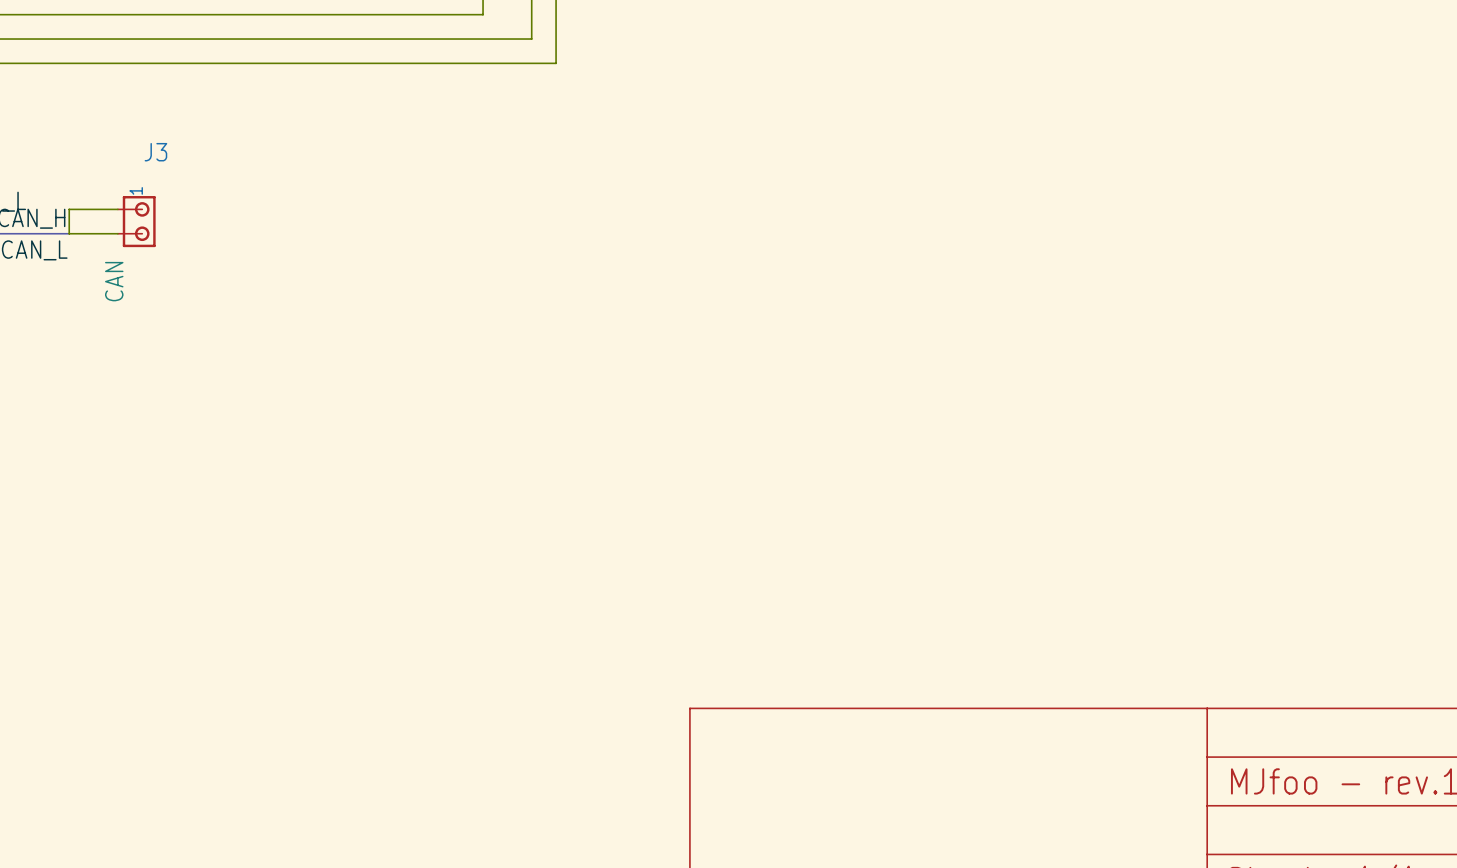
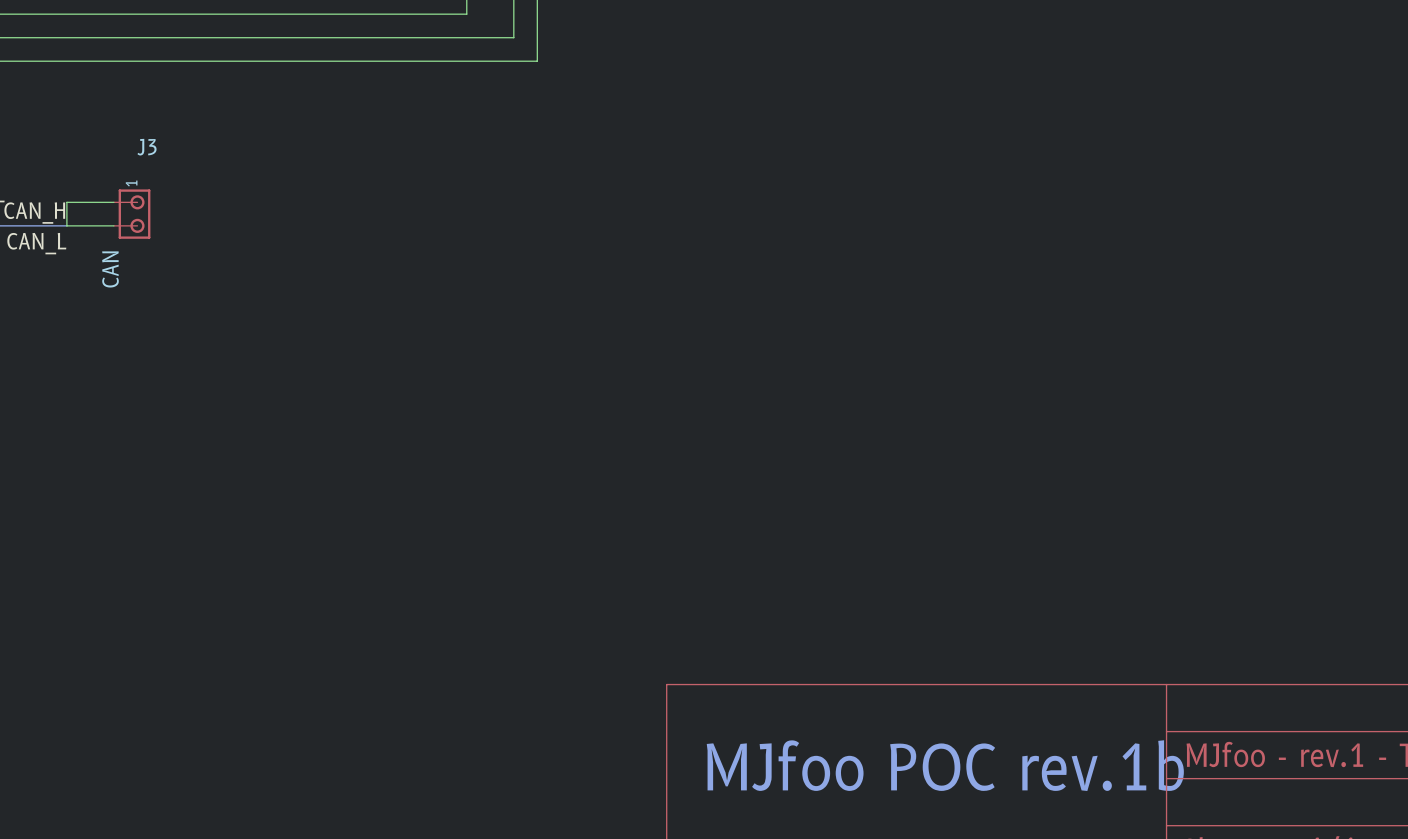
text: none -> MJfoo POC rev.1b (945, 765)

